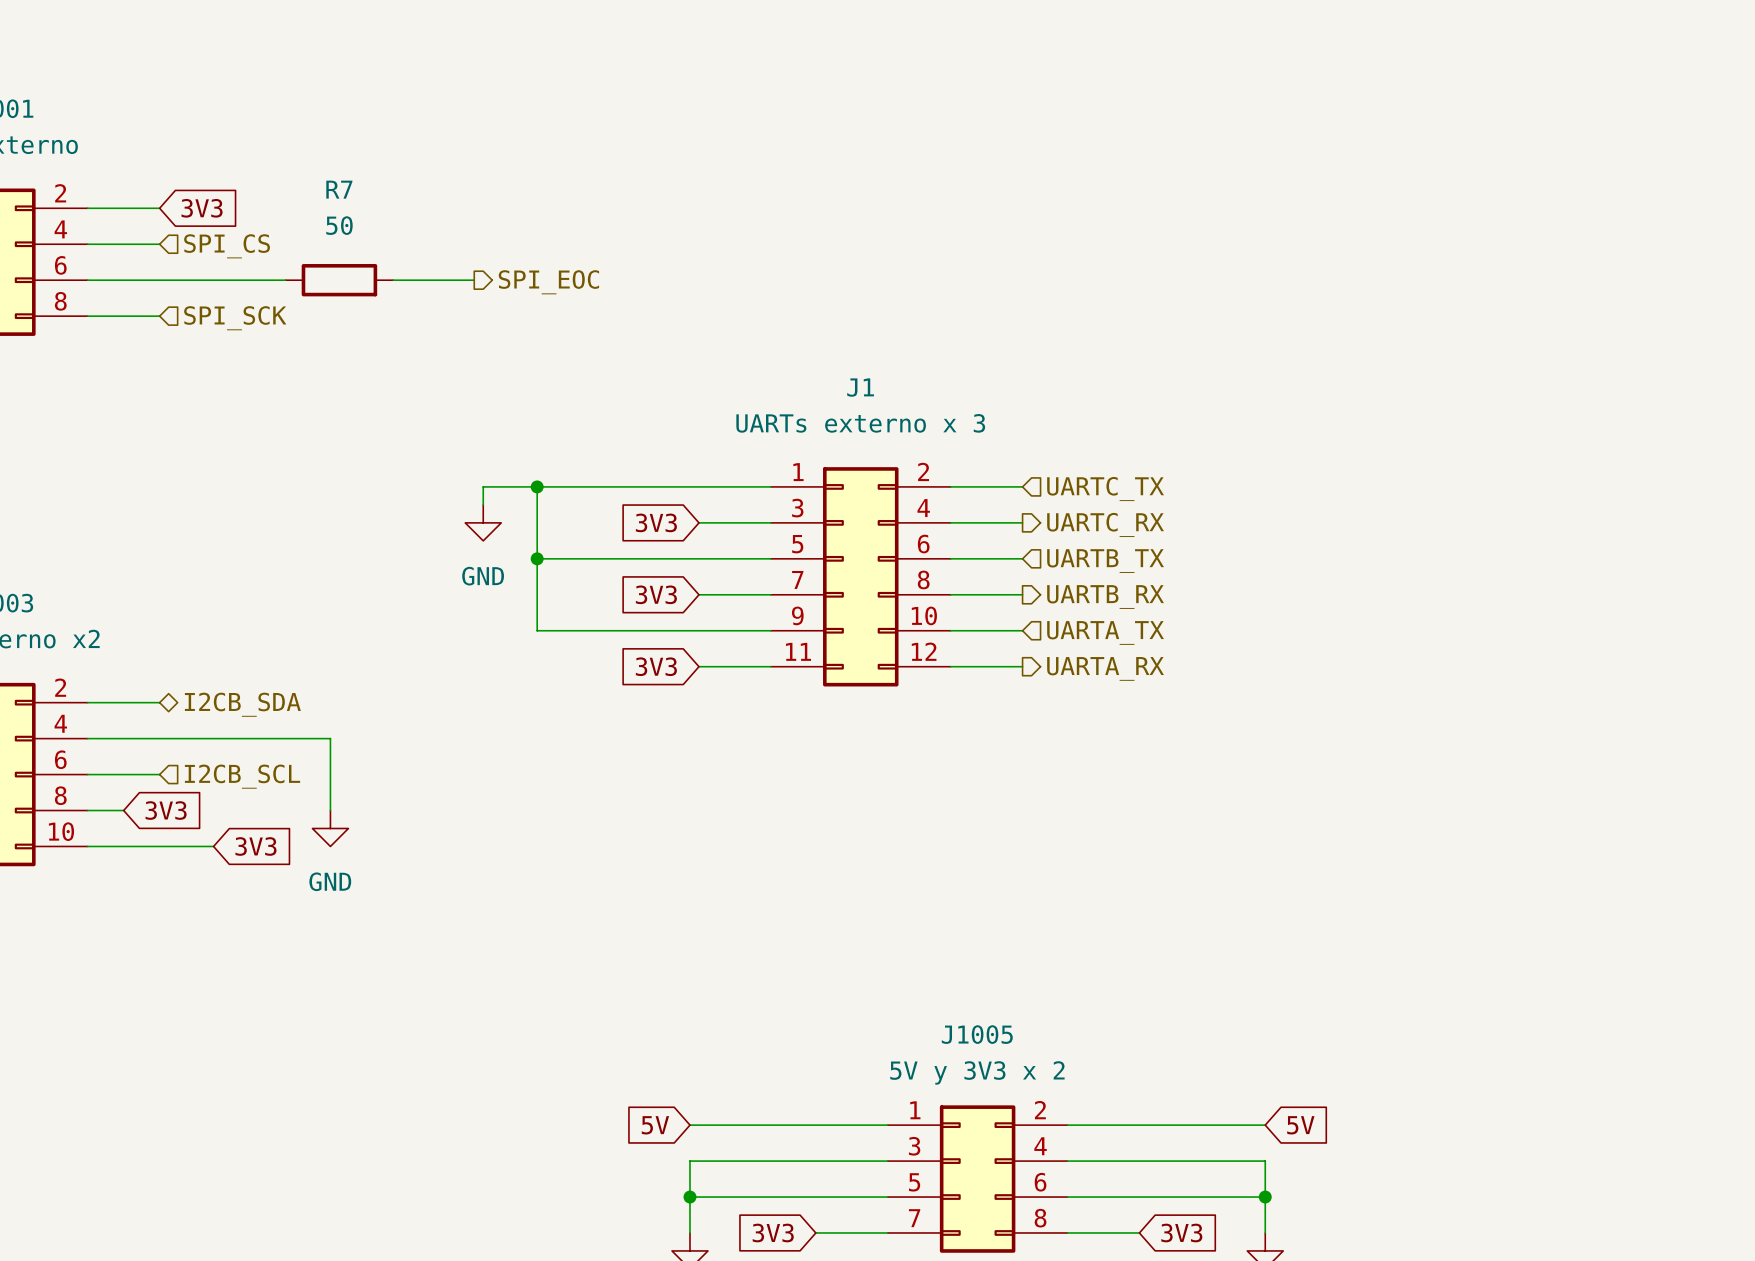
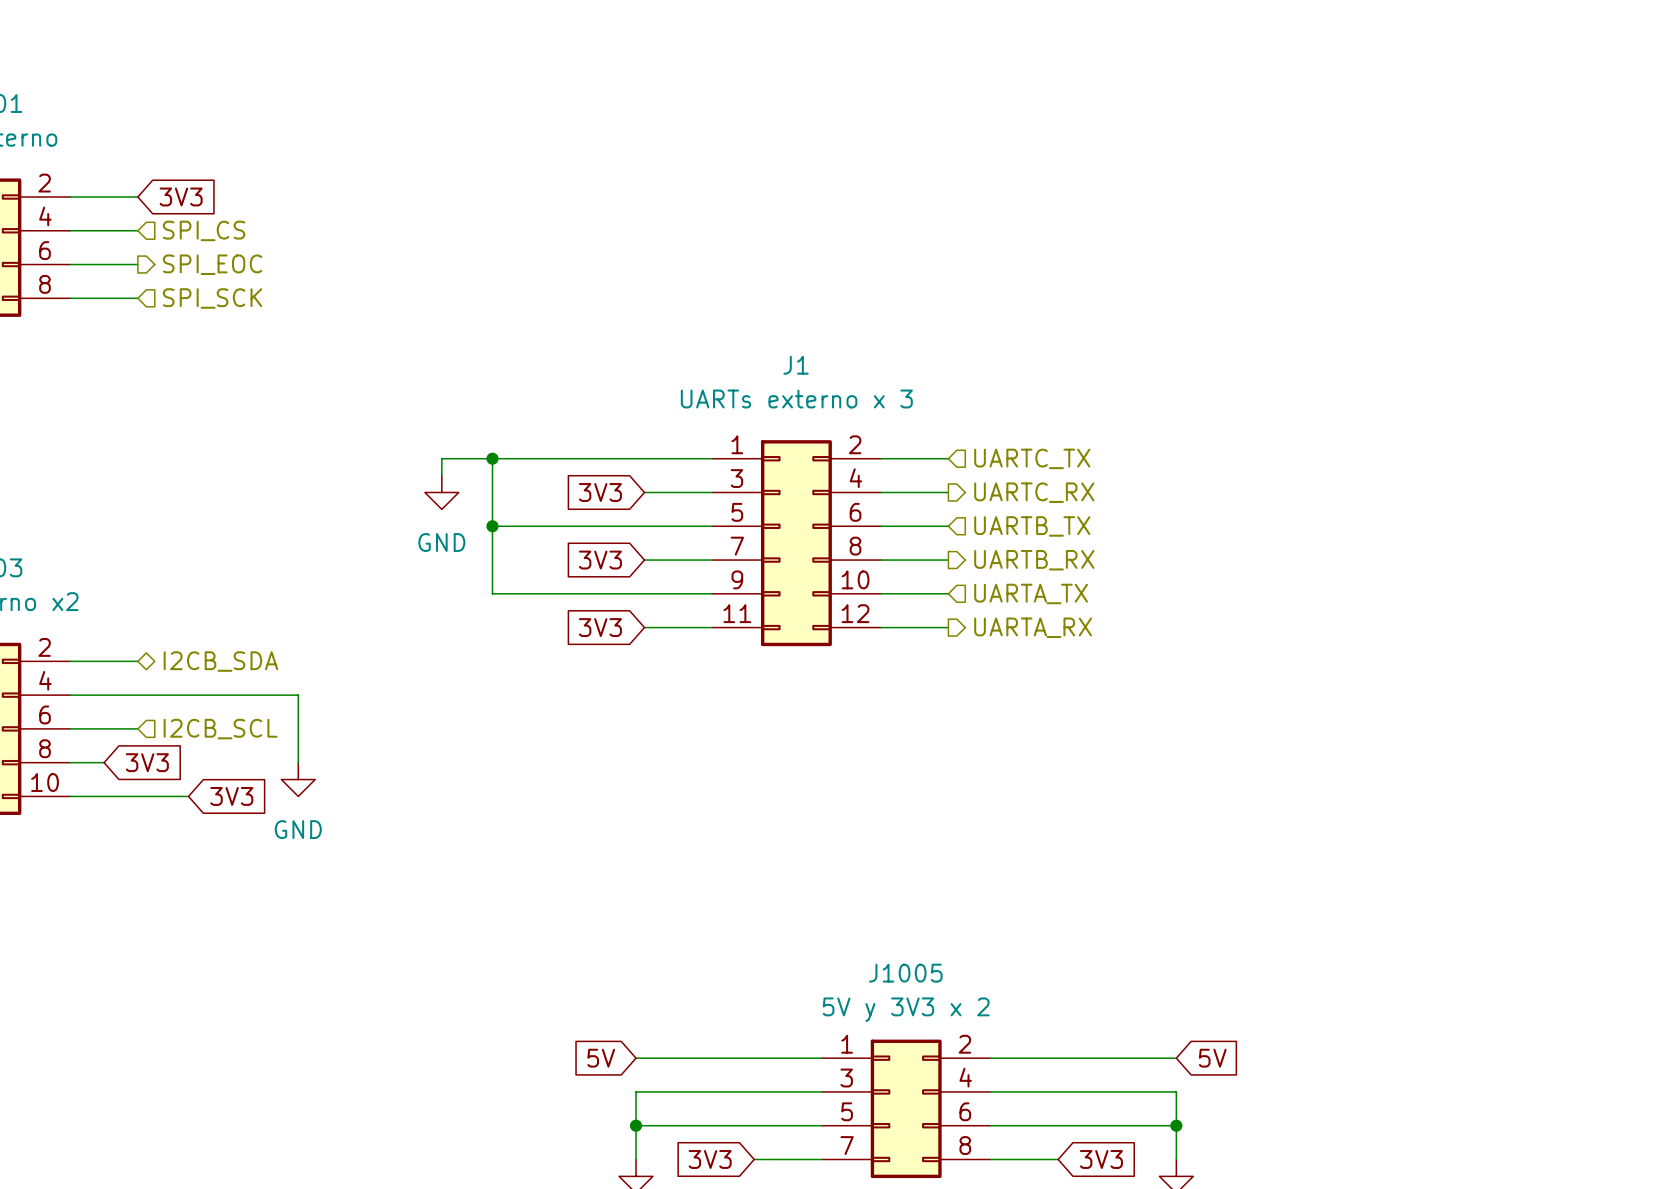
wire: (159, 280) (285, 280) -> none
R7: 50 (339, 280) -> none
wire: (393, 280) (474, 280) -> none
hierarchical label position: SPI_EOC (548, 282) -> SPI_EOC (212, 264)

